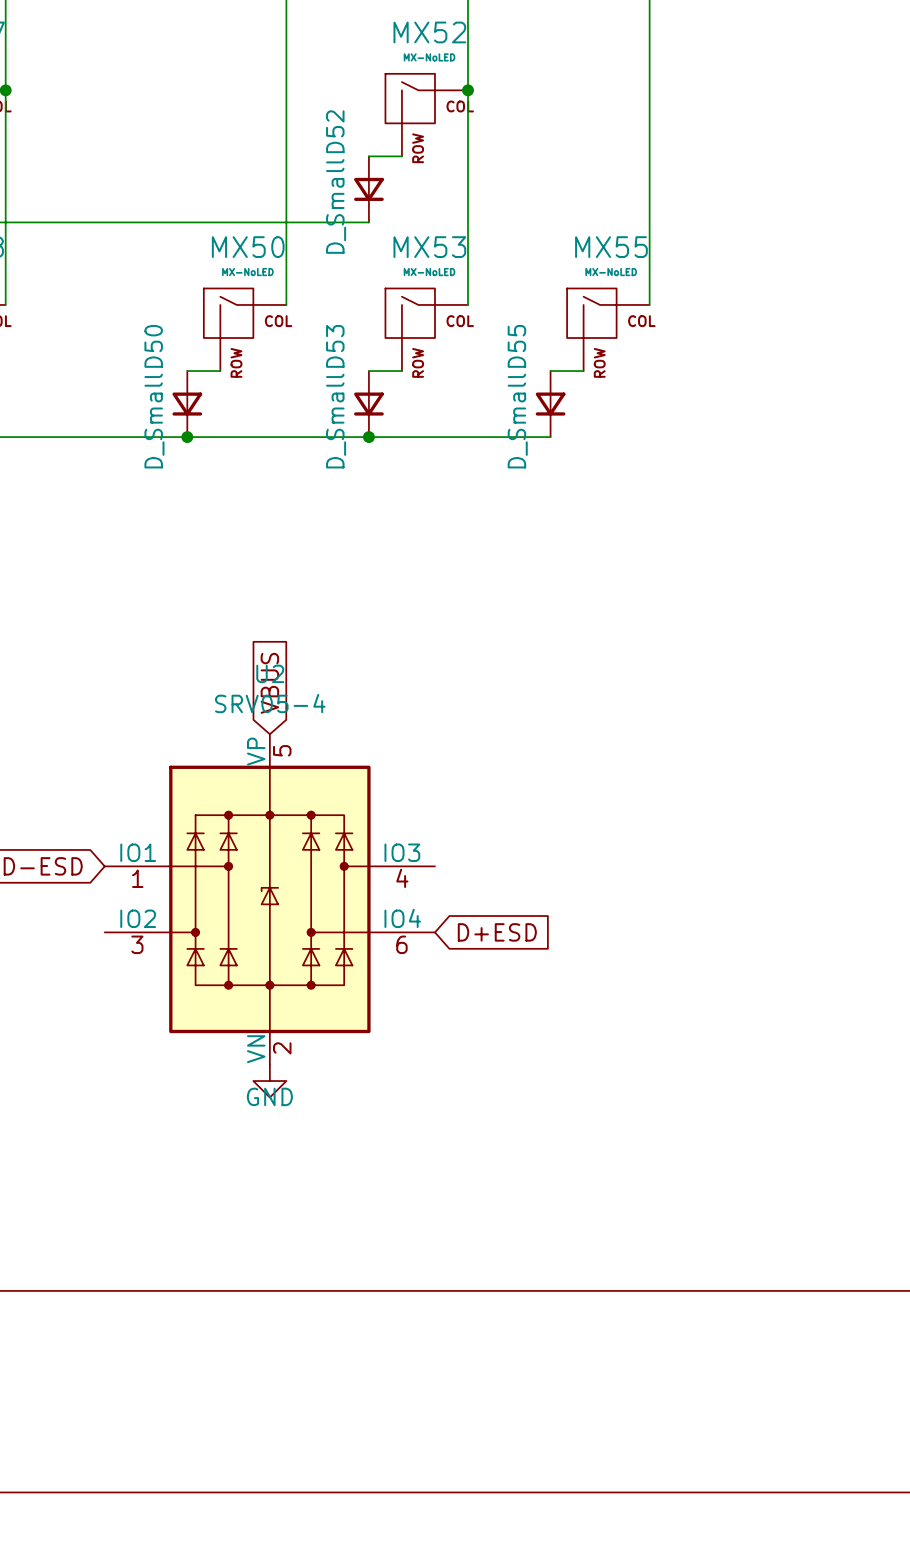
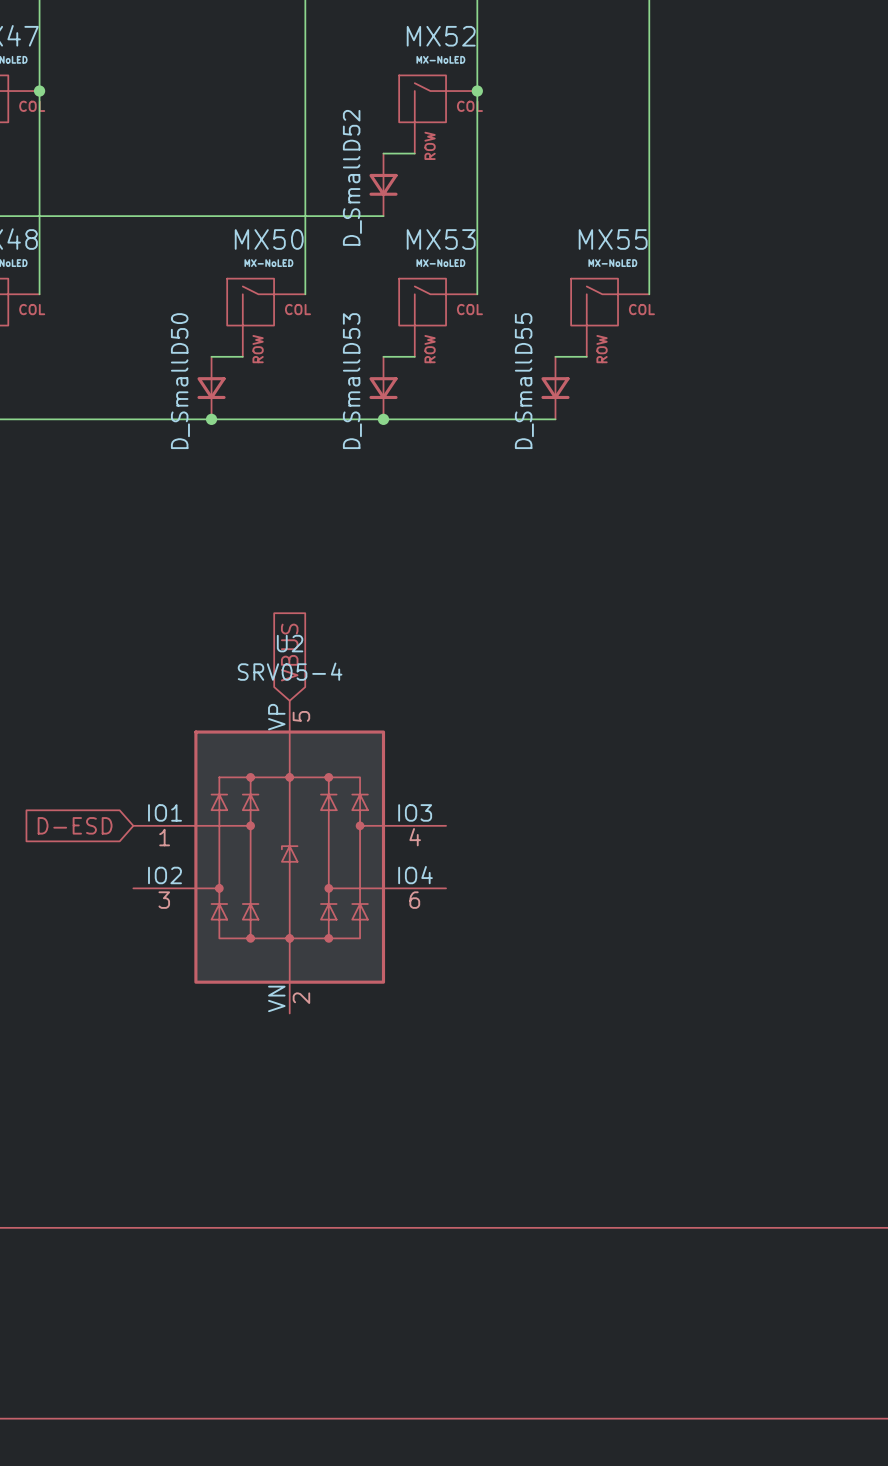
global label: D+ESD (497, 932) -> none
power symbol: GND (269, 1081) -> none

